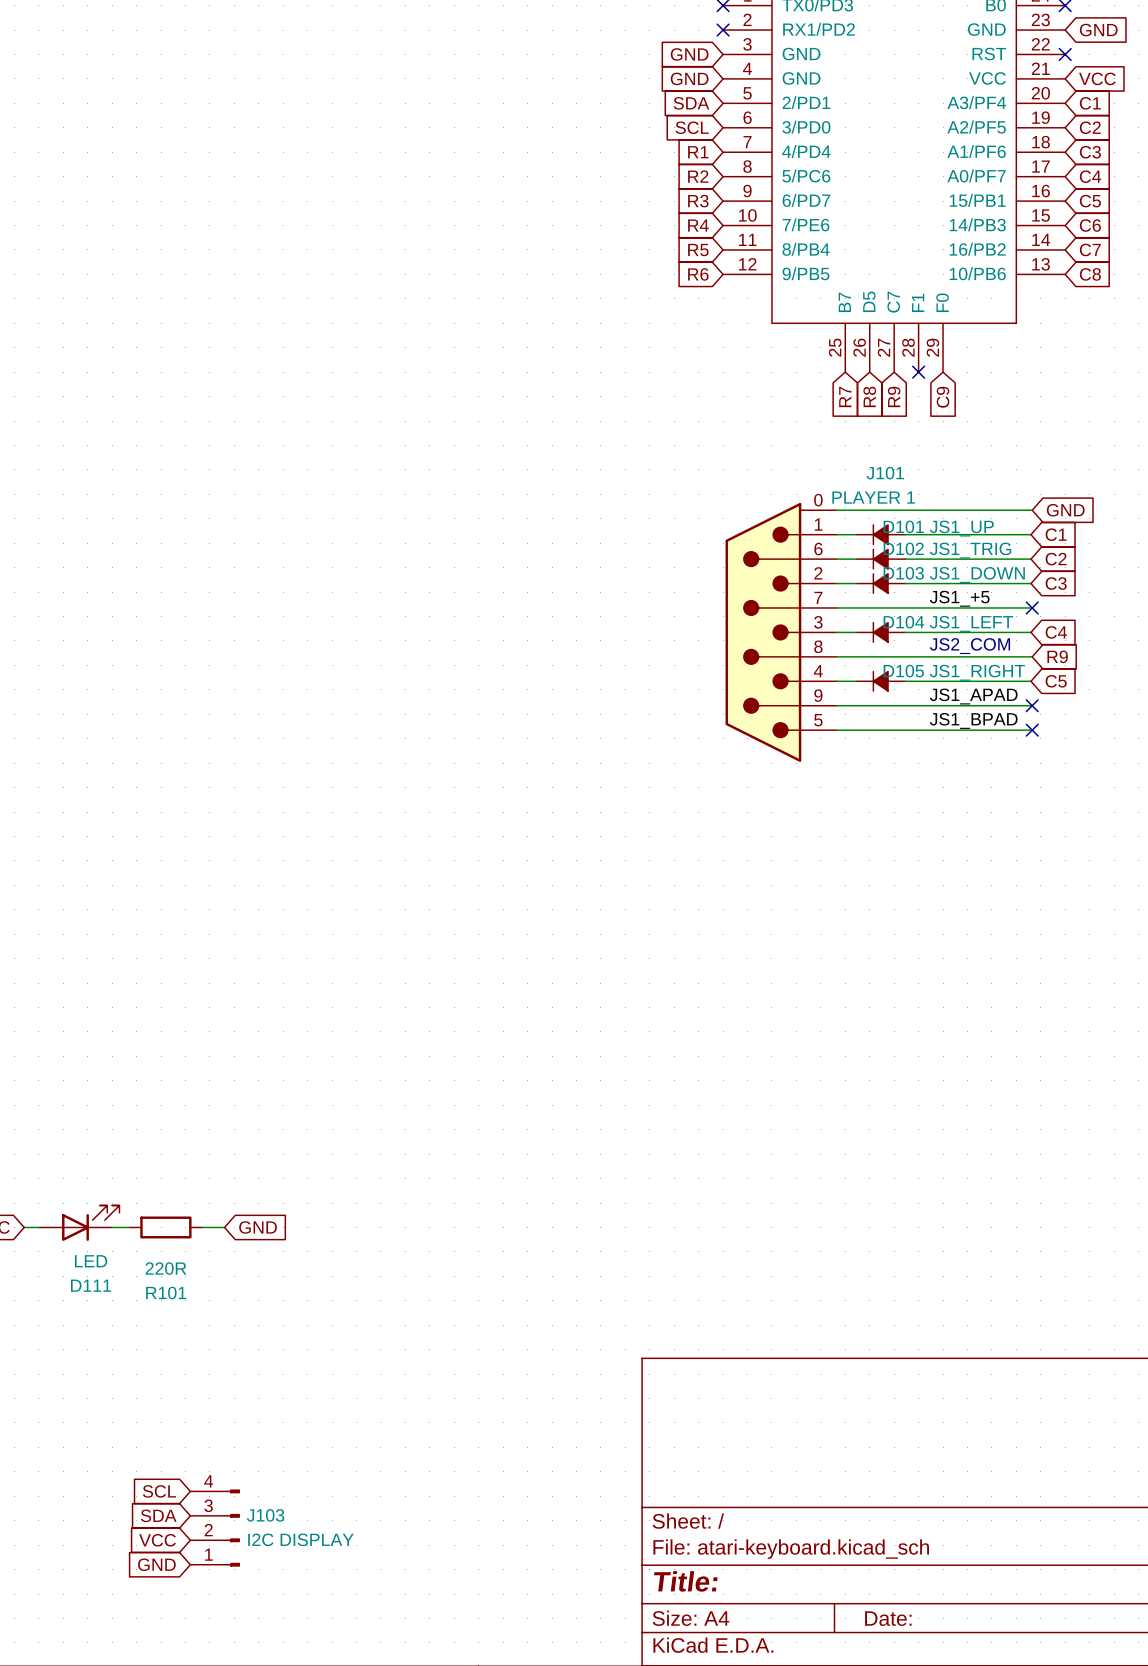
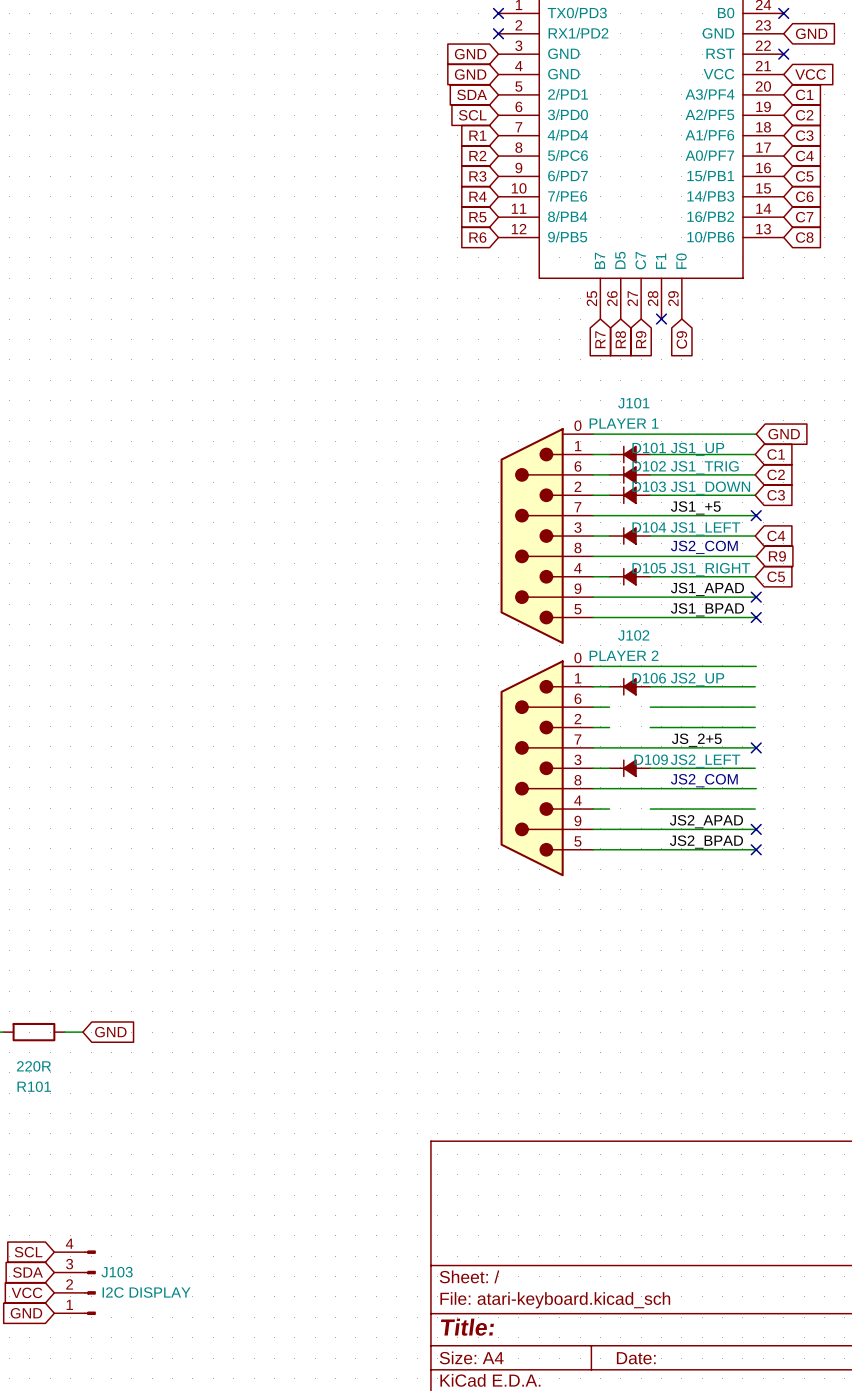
wire: none -> (593, 666) (756, 666)
wire: none -> (593, 686) (609, 686)
D106: none -> JS2_UP (629, 686)
wire: none -> (650, 686) (755, 686)
wire: none -> (593, 707) (609, 707)
wire: none -> (650, 707) (755, 707)
wire: none -> (593, 727) (609, 727)
wire: none -> (650, 727) (755, 727)
label: none -> JS_2+5 (696, 740)
wire: none -> (593, 747) (756, 747)
no-connect mark: none -> (756, 747)
J102: none -> PLAYER 2 (546, 768)
wire: none -> (593, 768) (609, 768)
D109: none -> JS2_LEFT (629, 768)
wire: none -> (650, 768) (755, 768)
text: none -> JS2_COM (704, 780)
wire: none -> (593, 788) (756, 788)
wire: none -> (593, 809) (609, 809)
wire: none -> (650, 809) (755, 809)
label: none -> JS2_APAD (706, 821)
wire: none -> (593, 829) (756, 829)
no-connect mark: none -> (756, 829)
label: none -> JS2_BPAD (706, 842)
wire: none -> (593, 849) (756, 849)
no-connect mark: none -> (756, 849)

